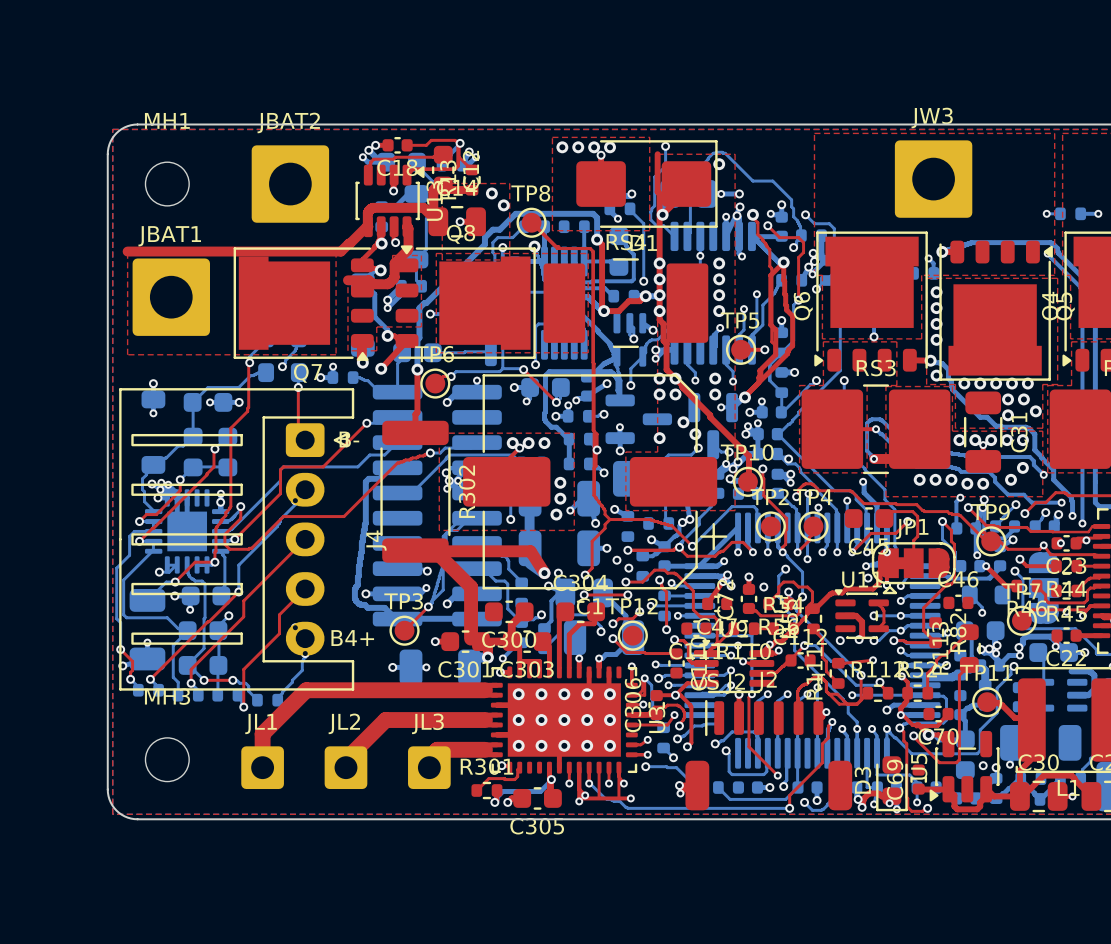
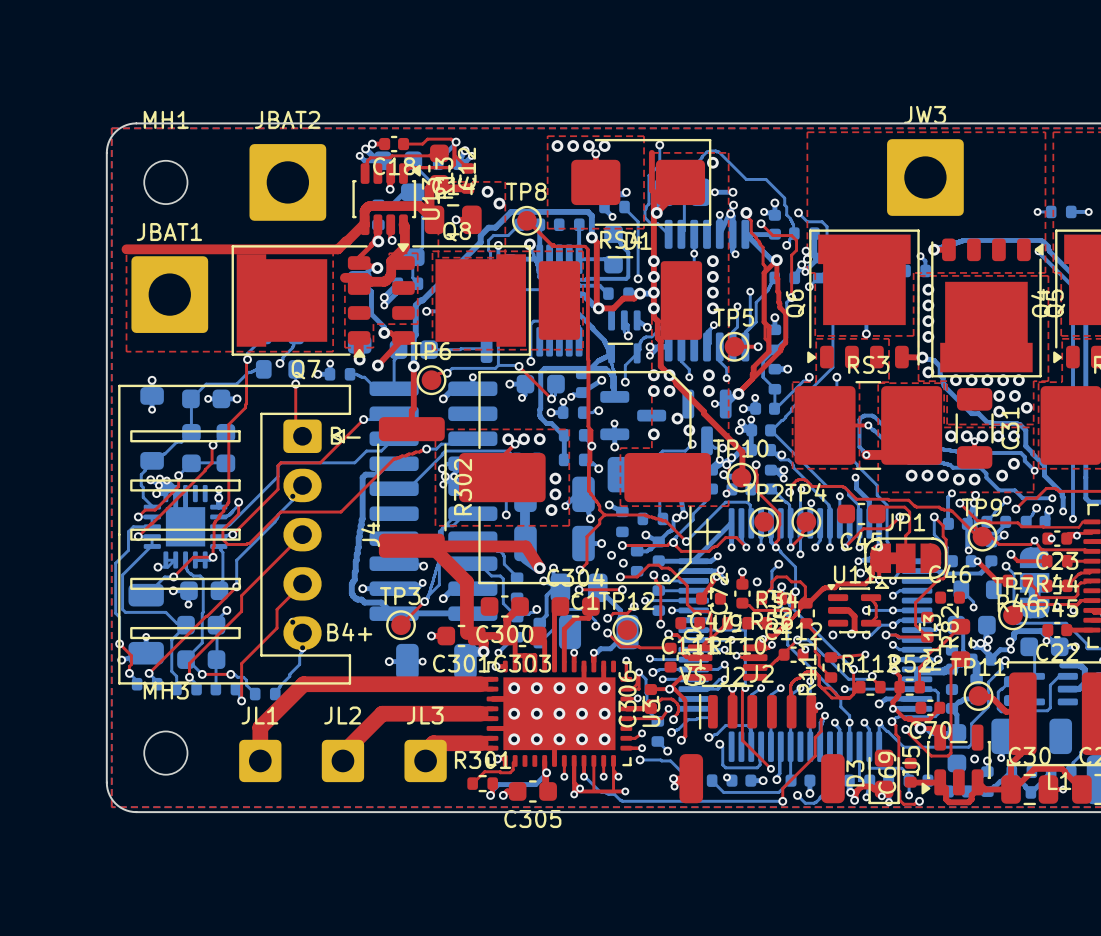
via: none -> (726, 493)
via: none -> (805, 649)
bottom track: none -> (1067, 676) (1059, 676) (1050, 685) (1050, 707) (1047, 710) (1001, 711) (998, 708) (998, 692) (1010, 681)
via: none -> (726, 777)

